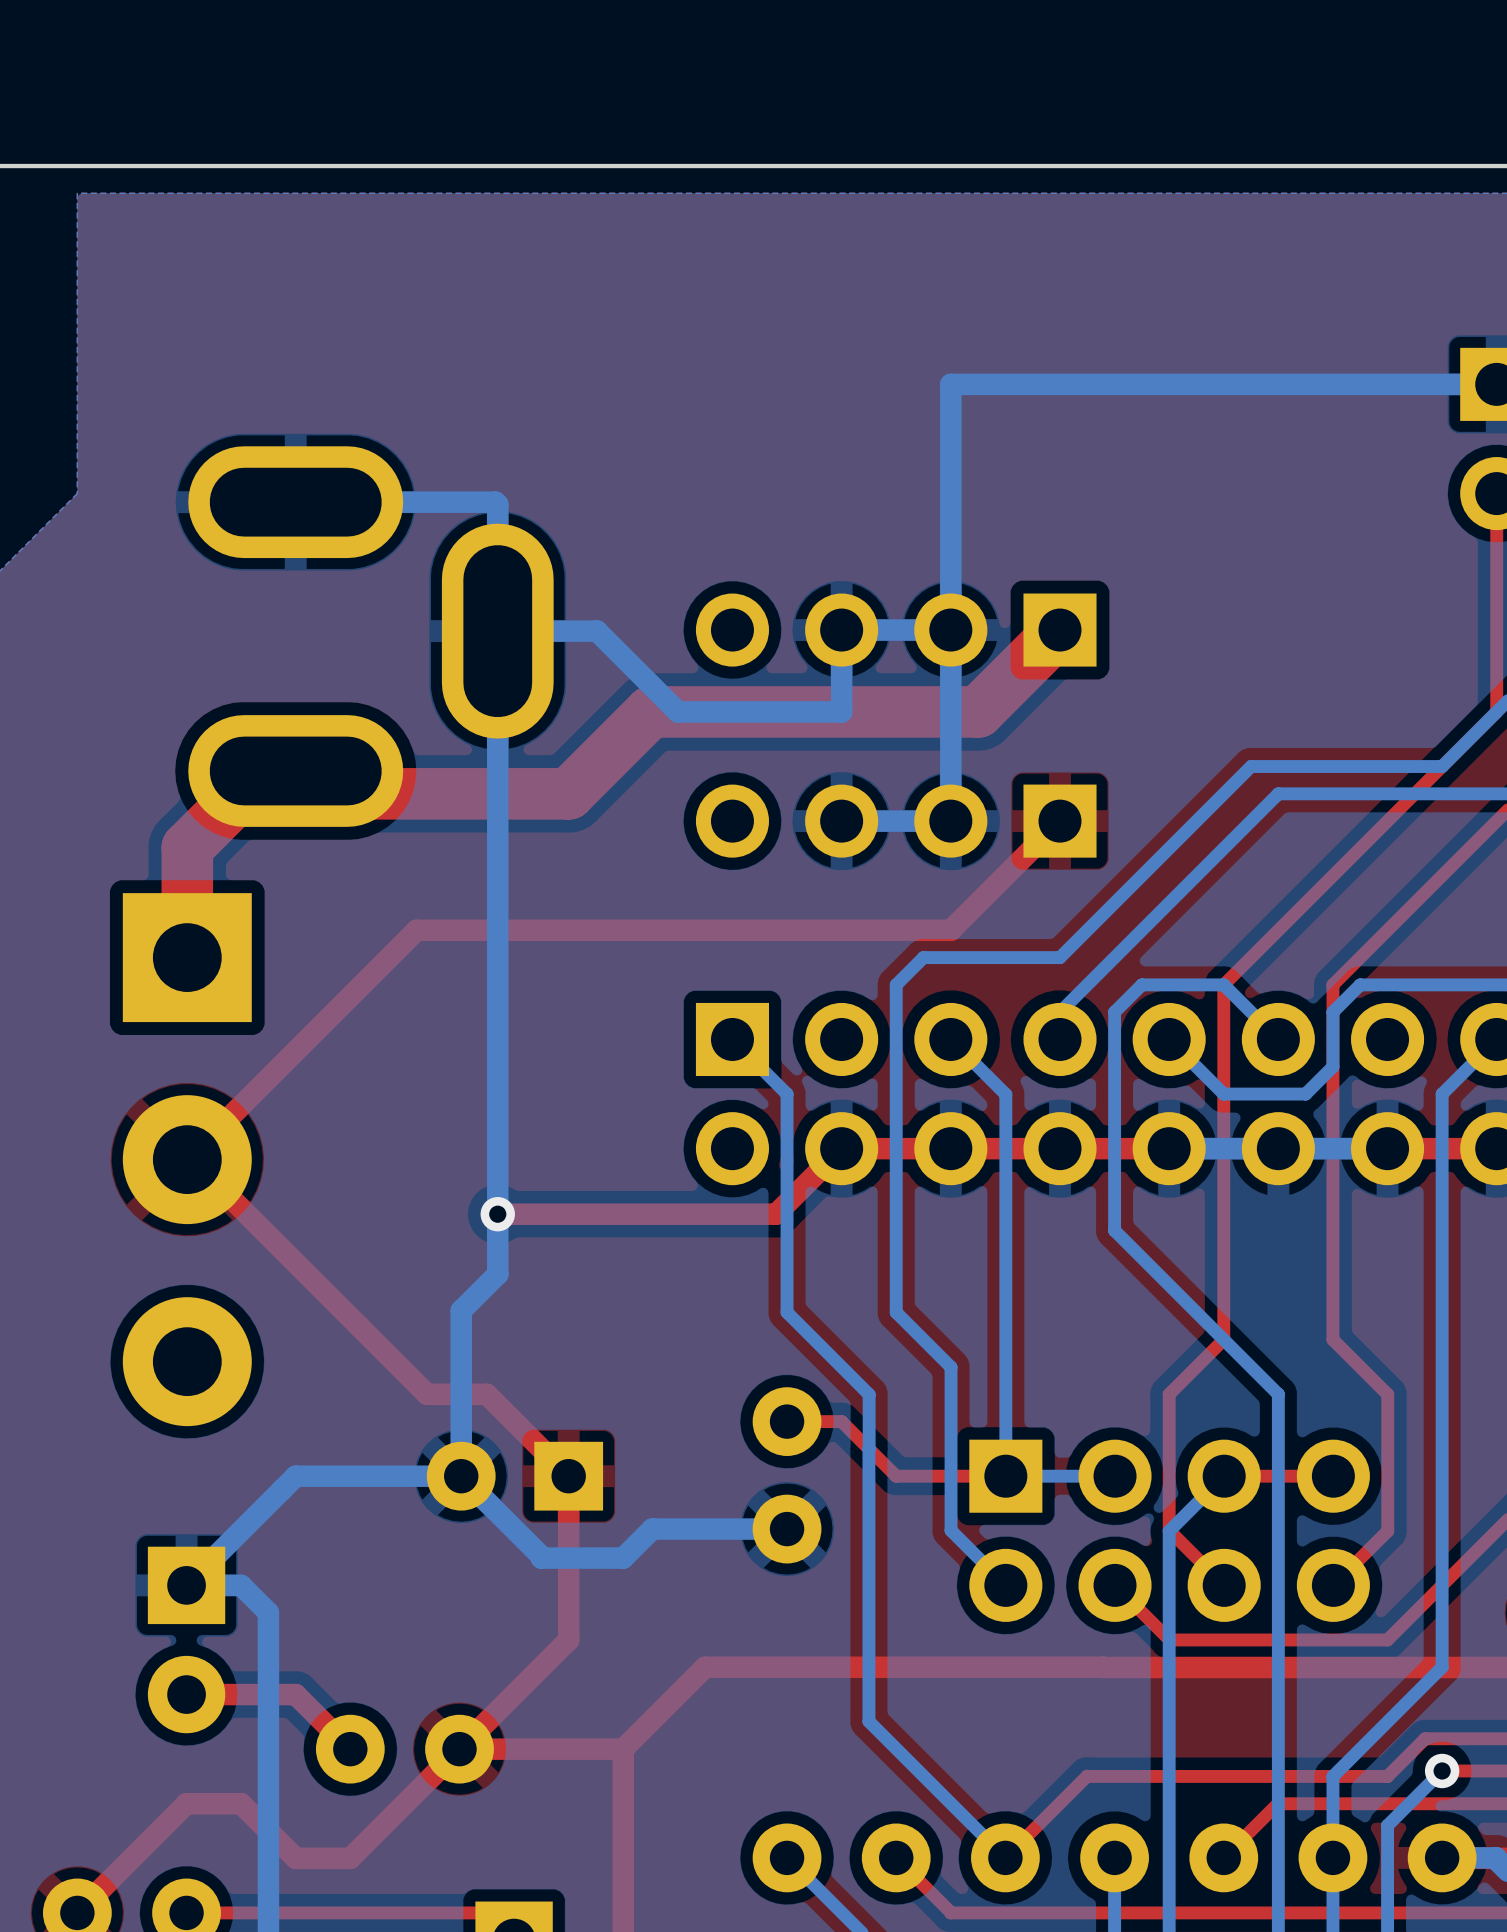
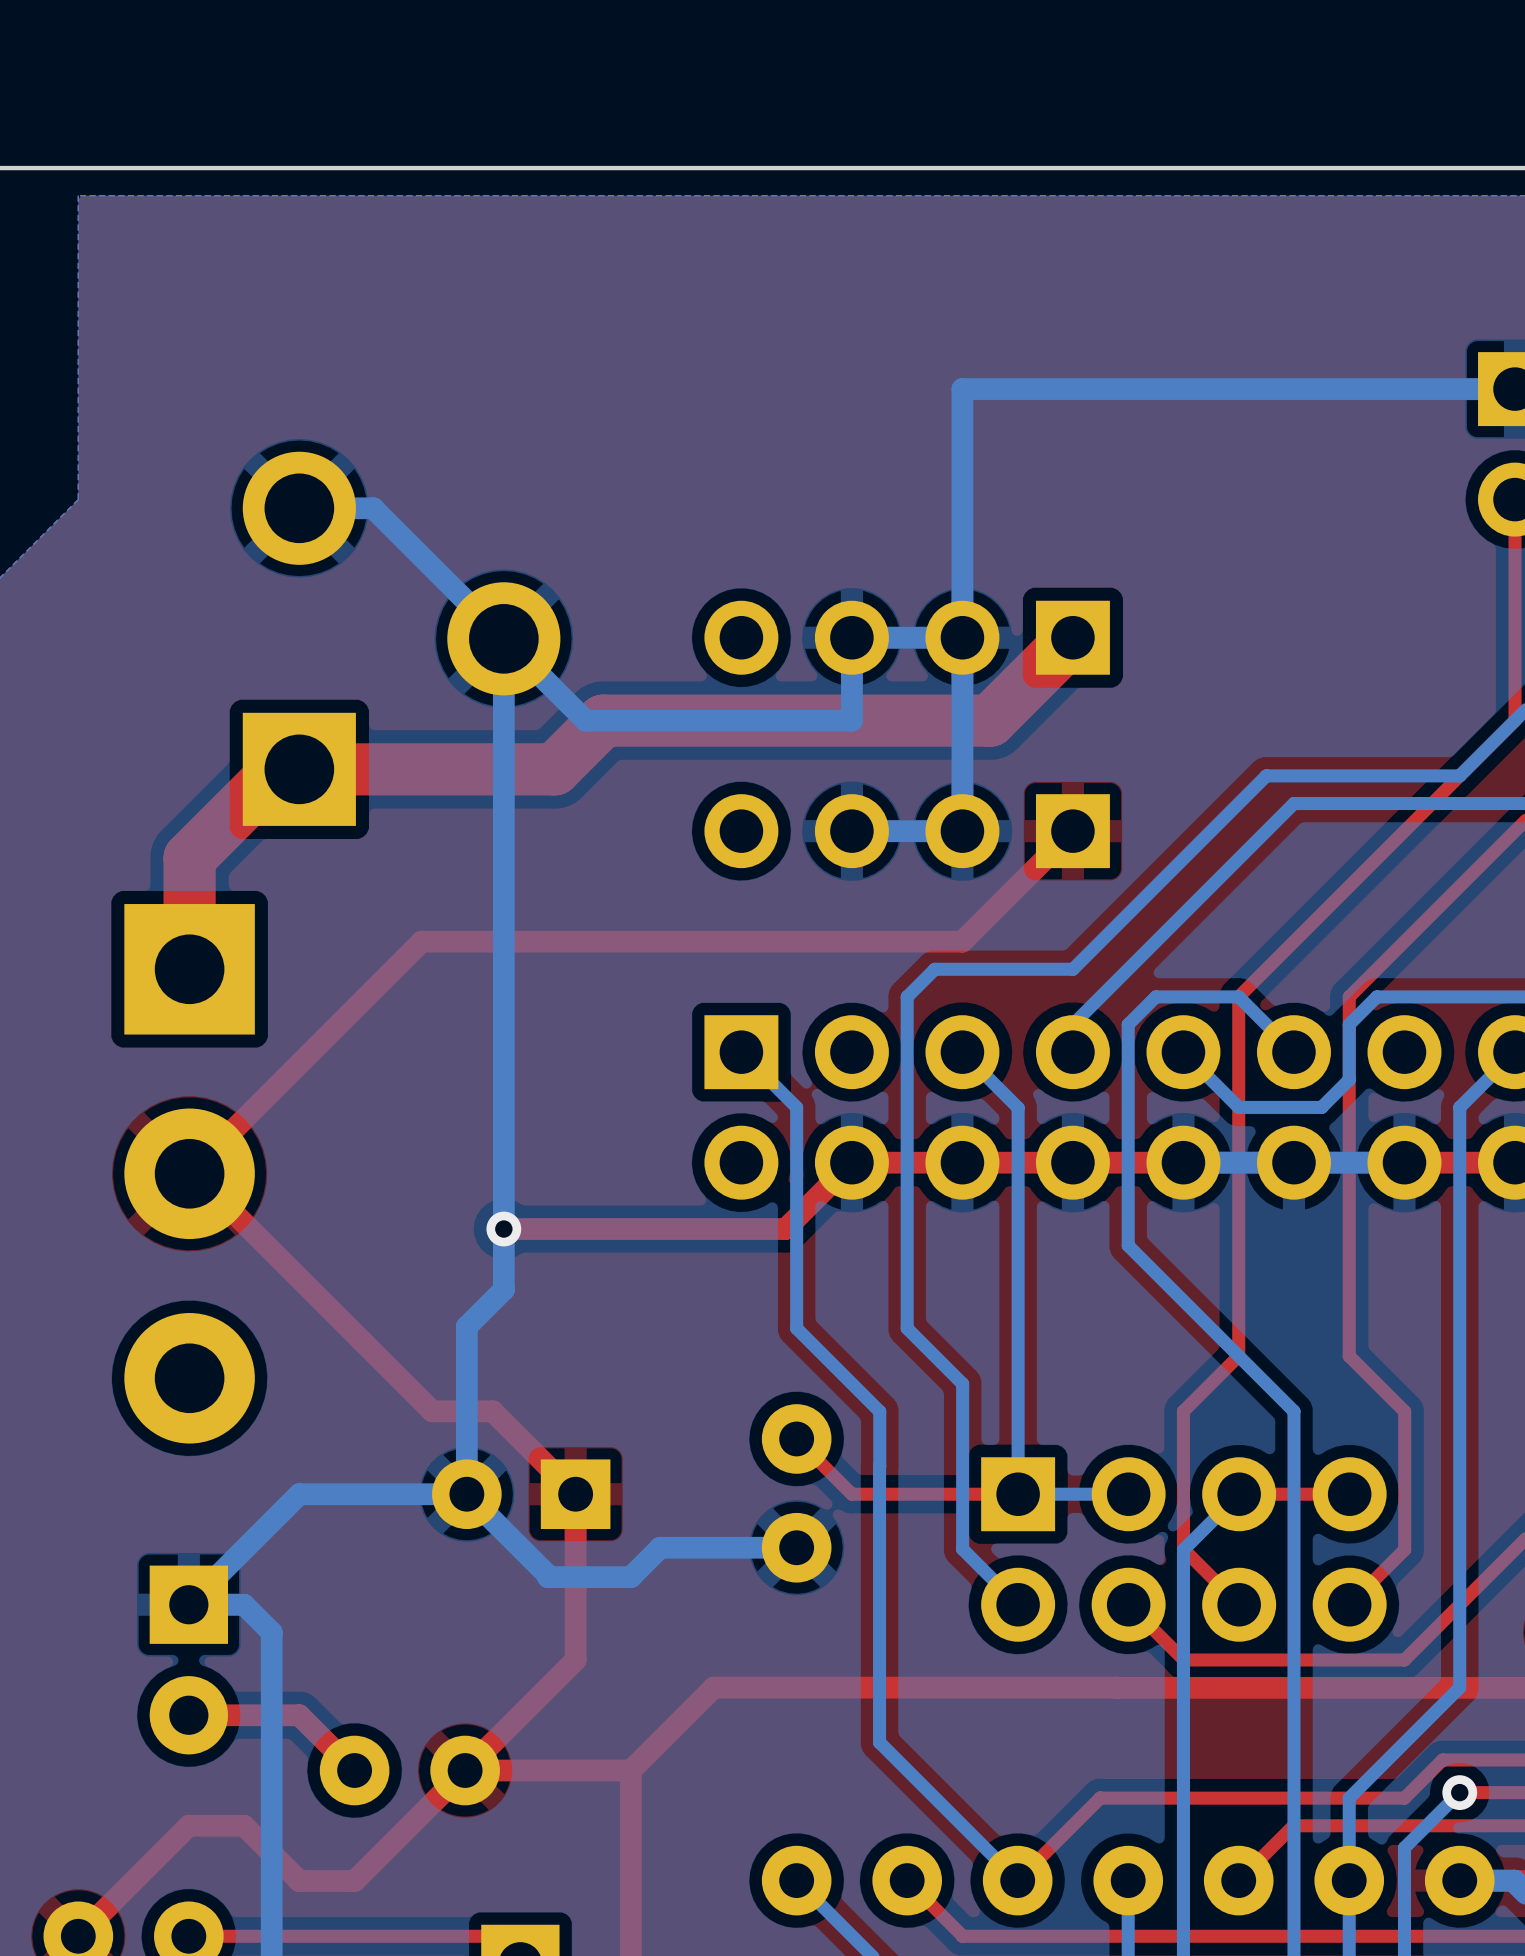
part footprint: [188, 446, 554, 827] -> [242, 451, 561, 826]
bottom track: (368, 502) (495, 502) (497, 504) (497, 631) (597, 631) (677, 711) -> (373, 508) (585, 720) (686, 720)
top track: (650, 711) (568, 793) (318, 793) (295, 770) -> (658, 720) (603, 720) (554, 769) (299, 769)
top track: (787, 1421) (841, 1421) (896, 1476) -> (796, 1438) (851, 1494) (907, 1494)

